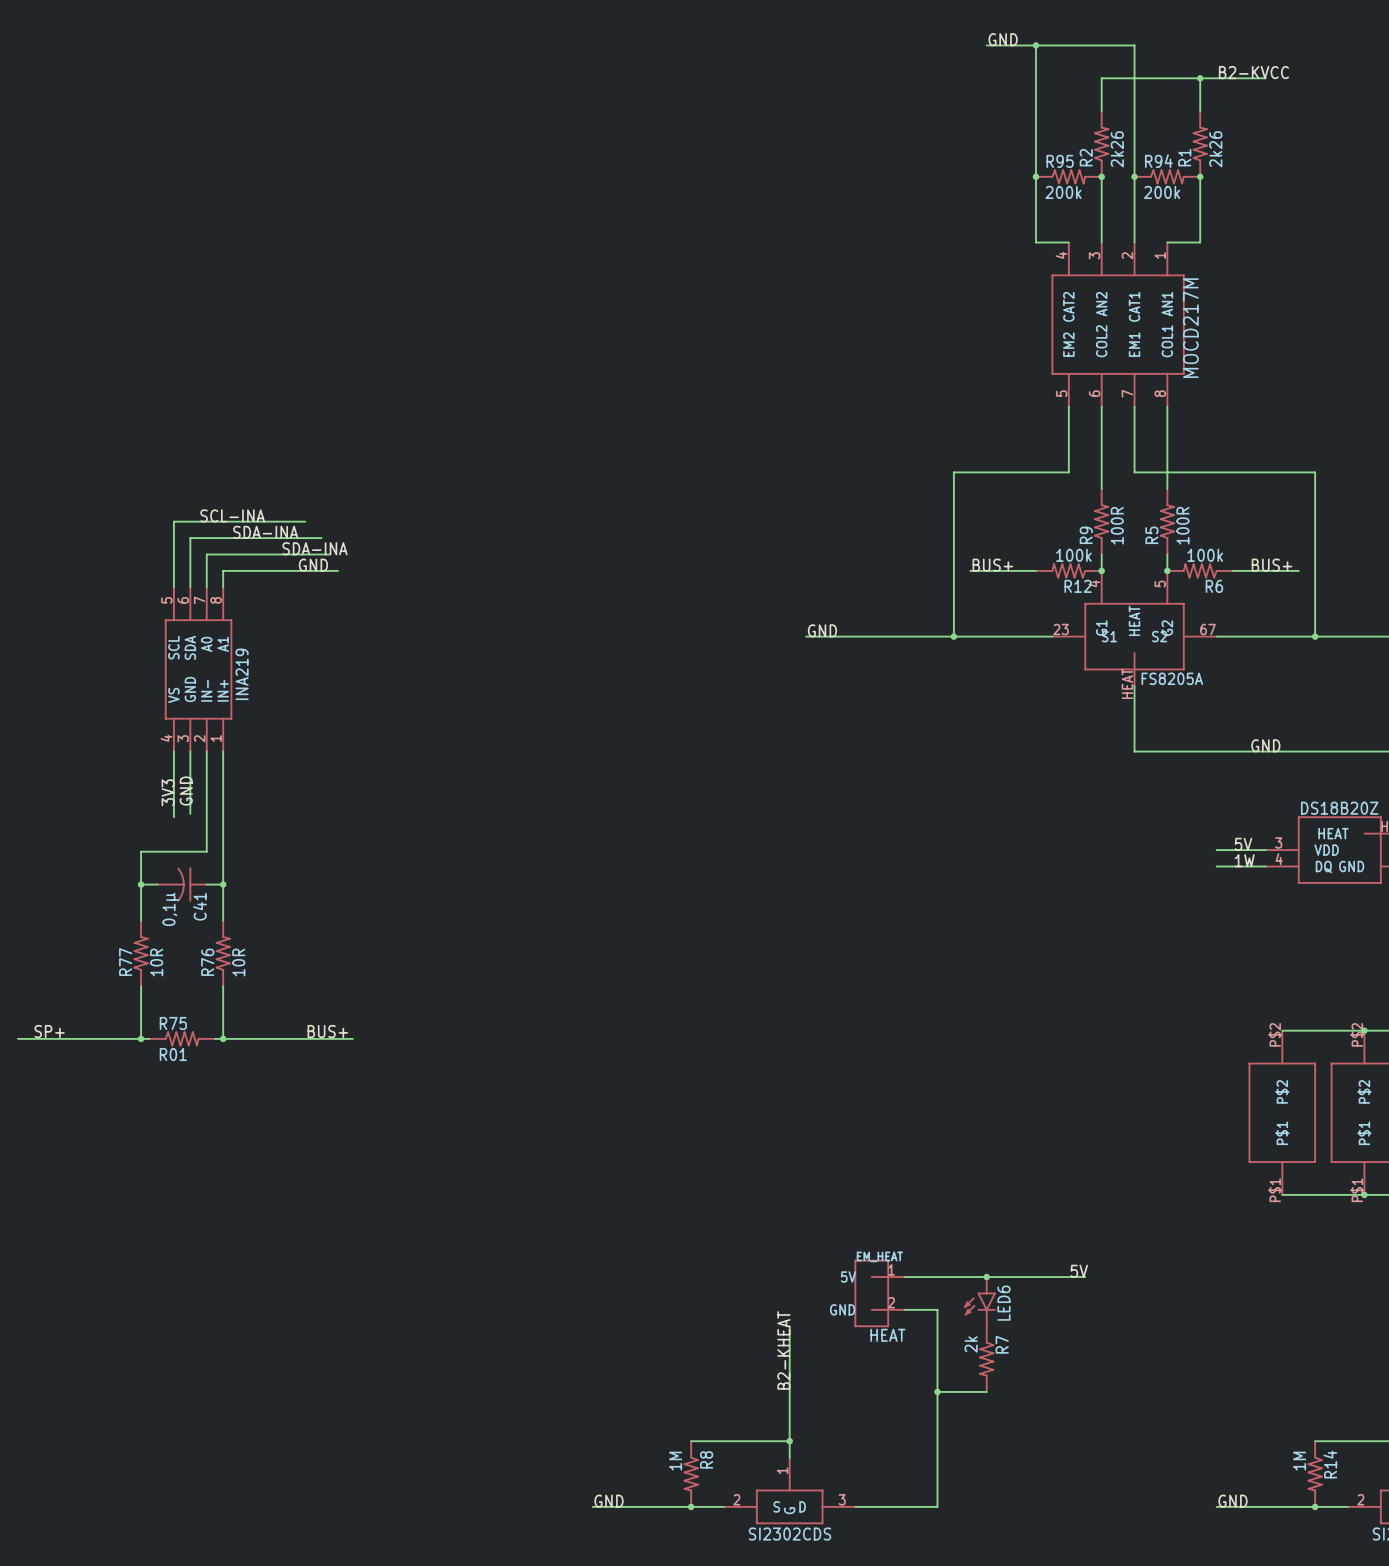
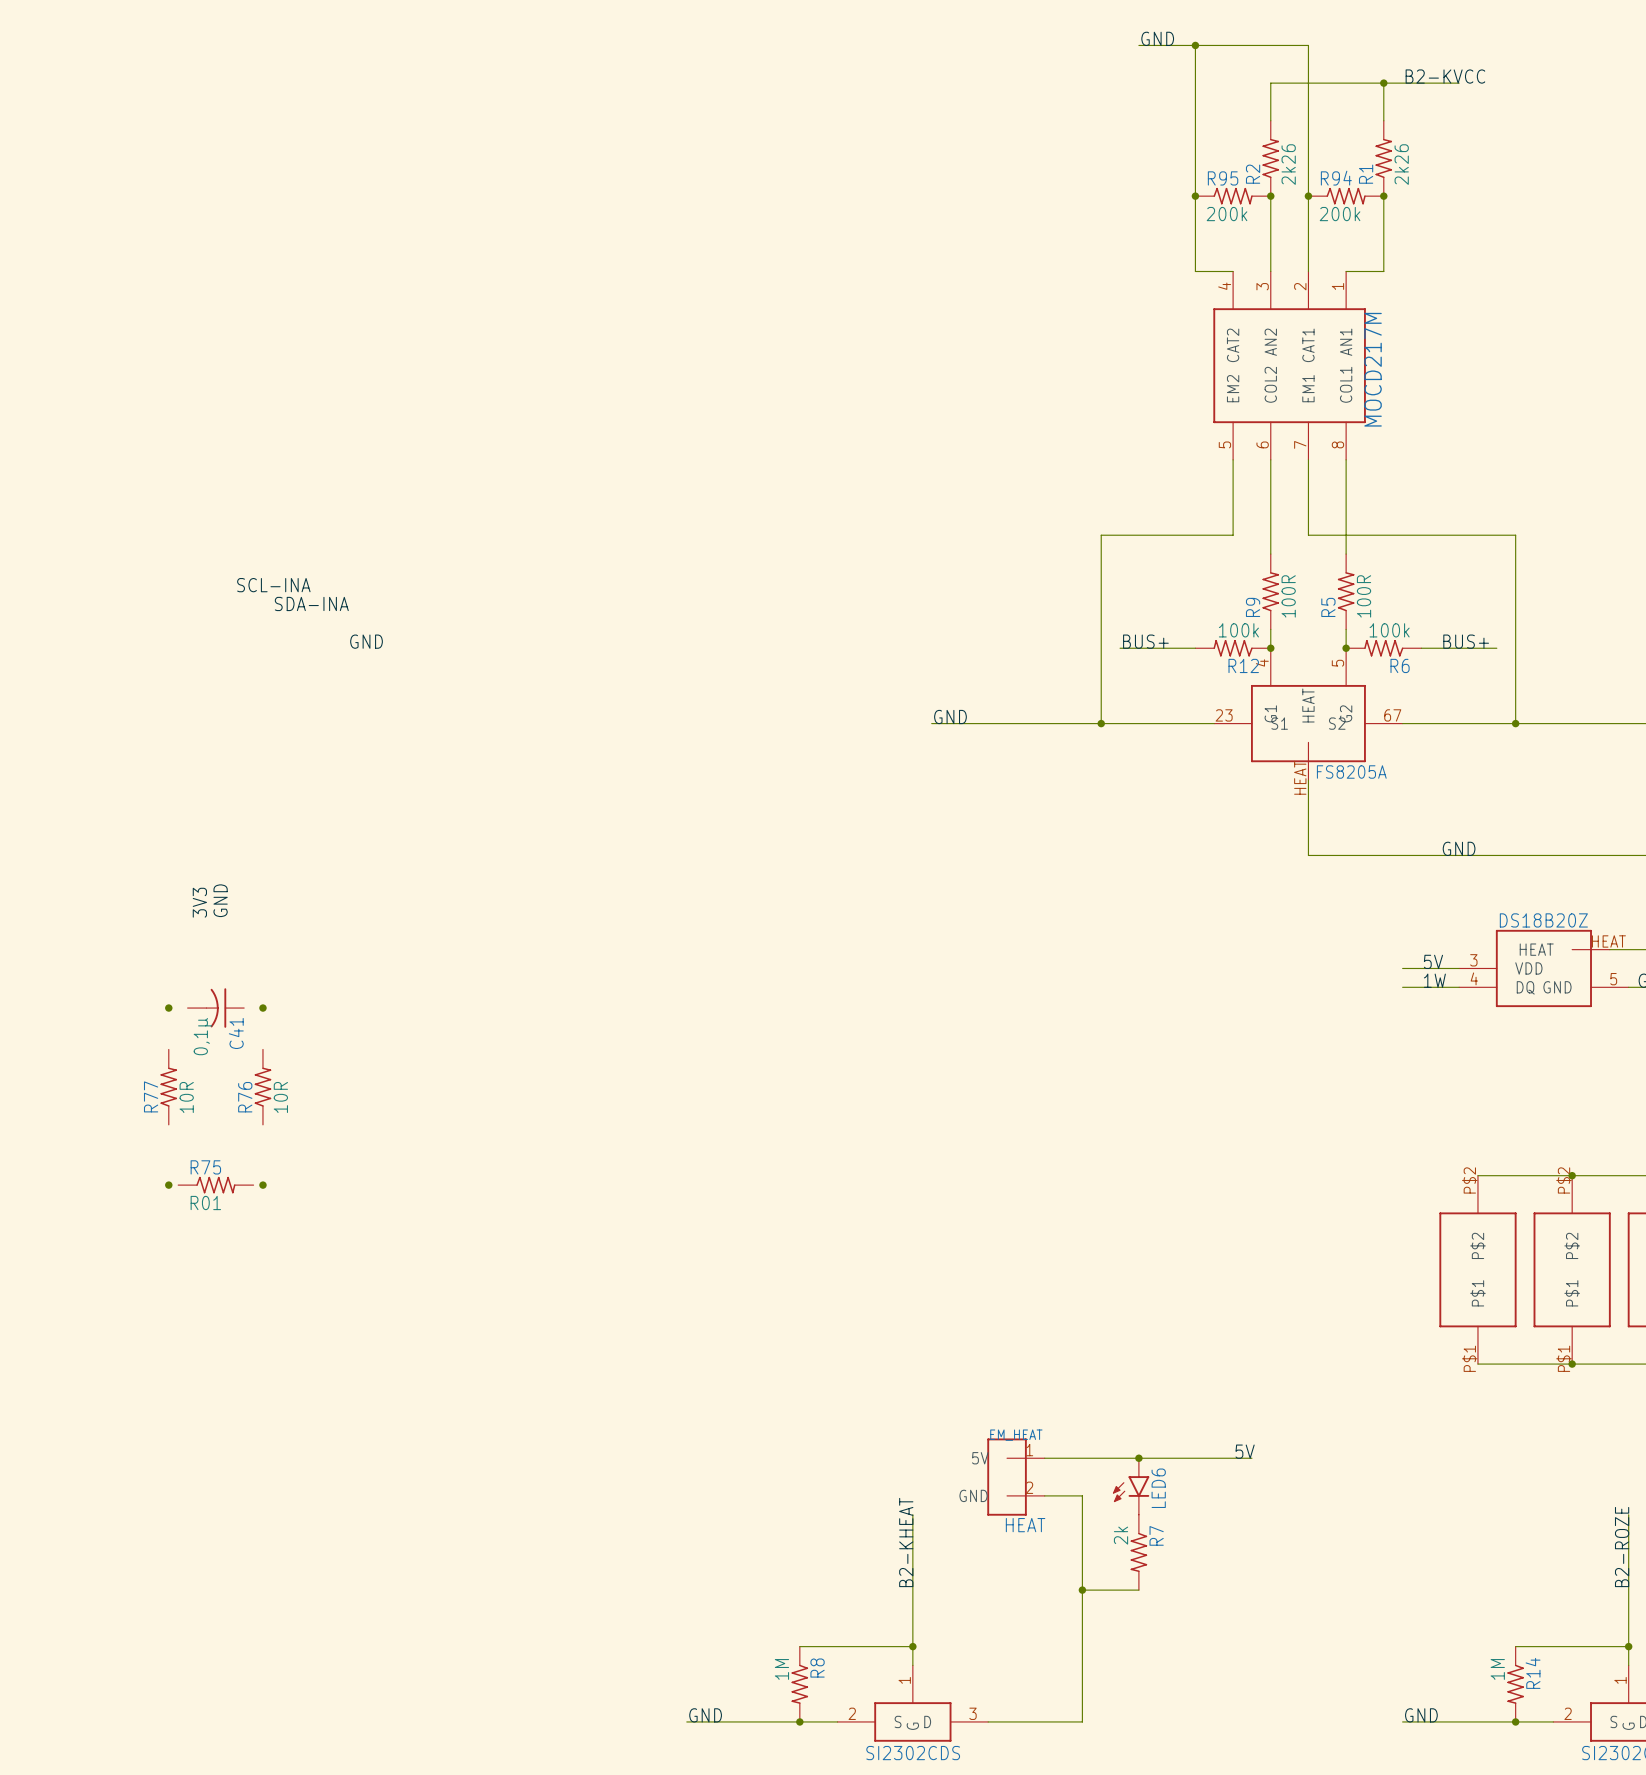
wire: (305, 521) (173, 521) (173, 587) -> none
wire: (321, 538) (190, 538) (190, 587) -> none
label: SDA-INA (315, 548) -> none
wire: (329, 554) (206, 554) (206, 587) -> none
wire: (338, 570) (223, 570) (223, 587) -> none
part: (198, 669) -> none
wire: (173, 751) (173, 817) -> none
wire: (190, 751) (190, 813) -> none
wire: (206, 751) (206, 851) (141, 851) (141, 920) -> none
wire: (223, 751) (223, 920) -> none
wire: (141, 884) (157, 884) -> none
wire: (206, 884) (223, 884) -> none
wire: (141, 986) (141, 1038) -> none
wire: (223, 986) (223, 1038) -> none
label: SP+ (49, 1031) -> none
label: BUS+ (327, 1031) -> none
wire: (17, 1038) (149, 1038) -> none
wire: (214, 1038) (352, 1038) -> none

